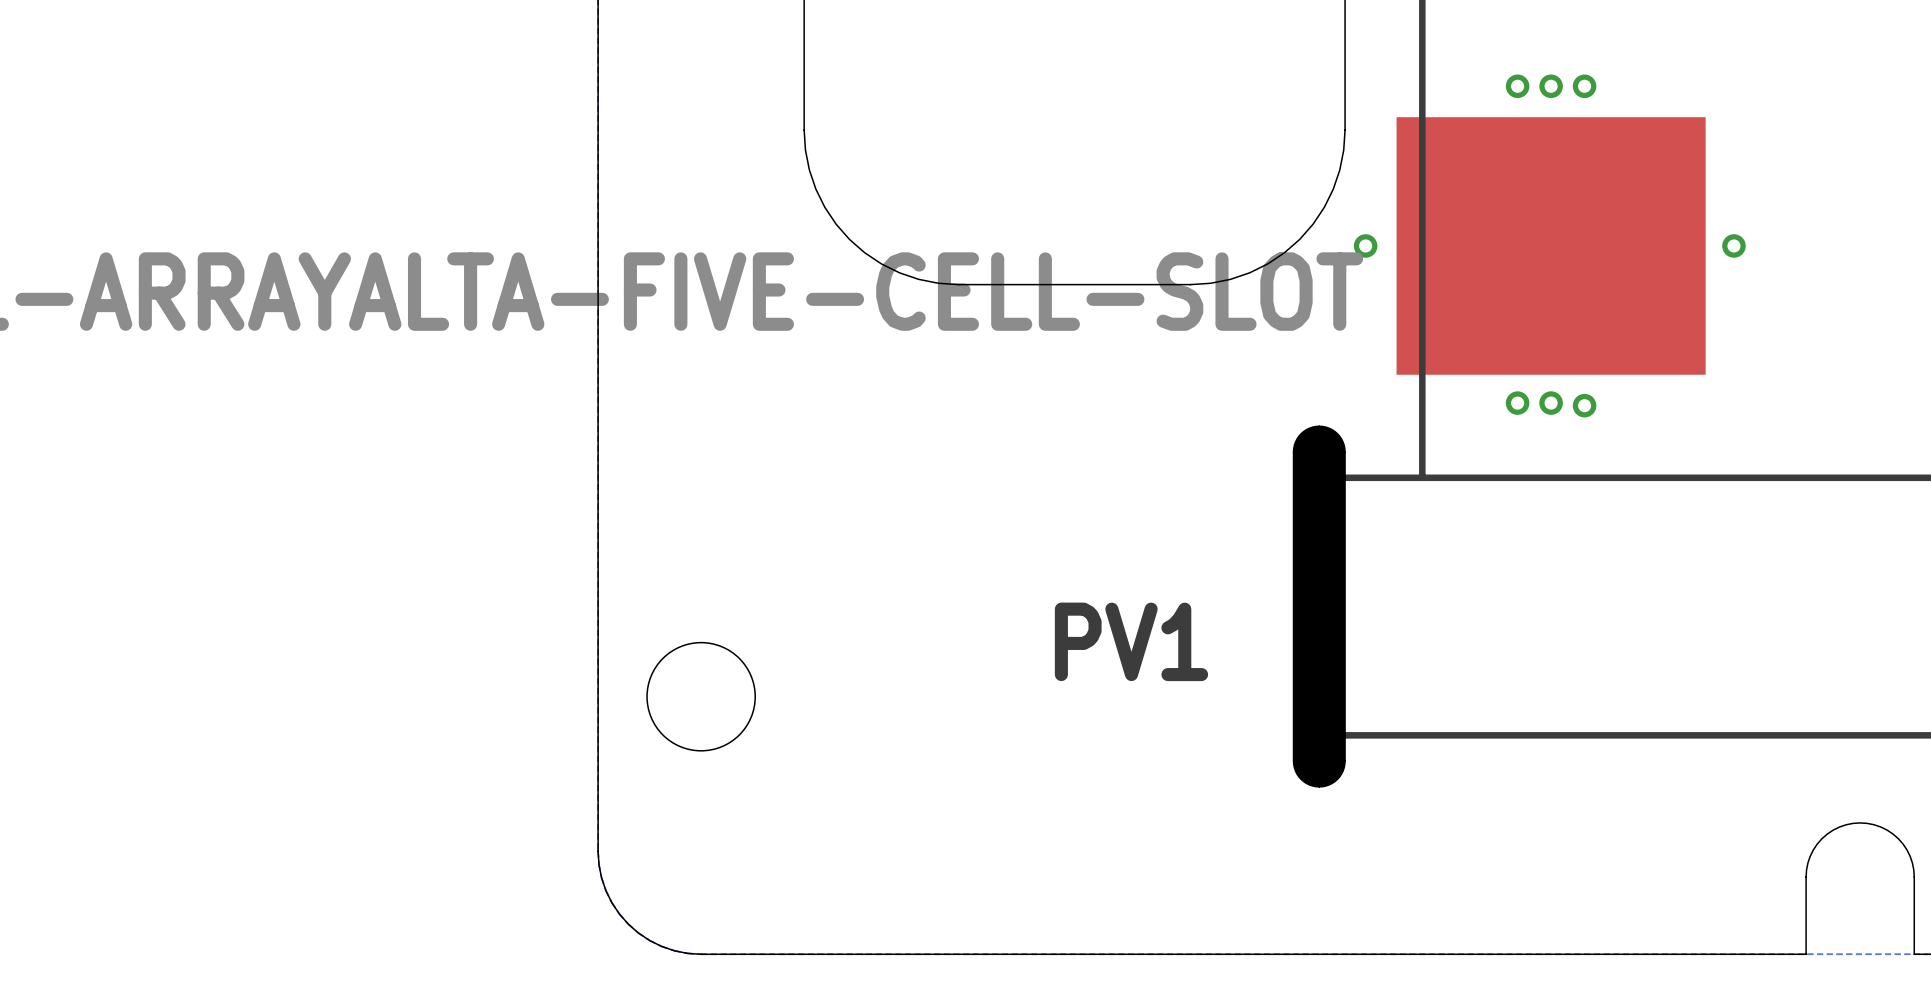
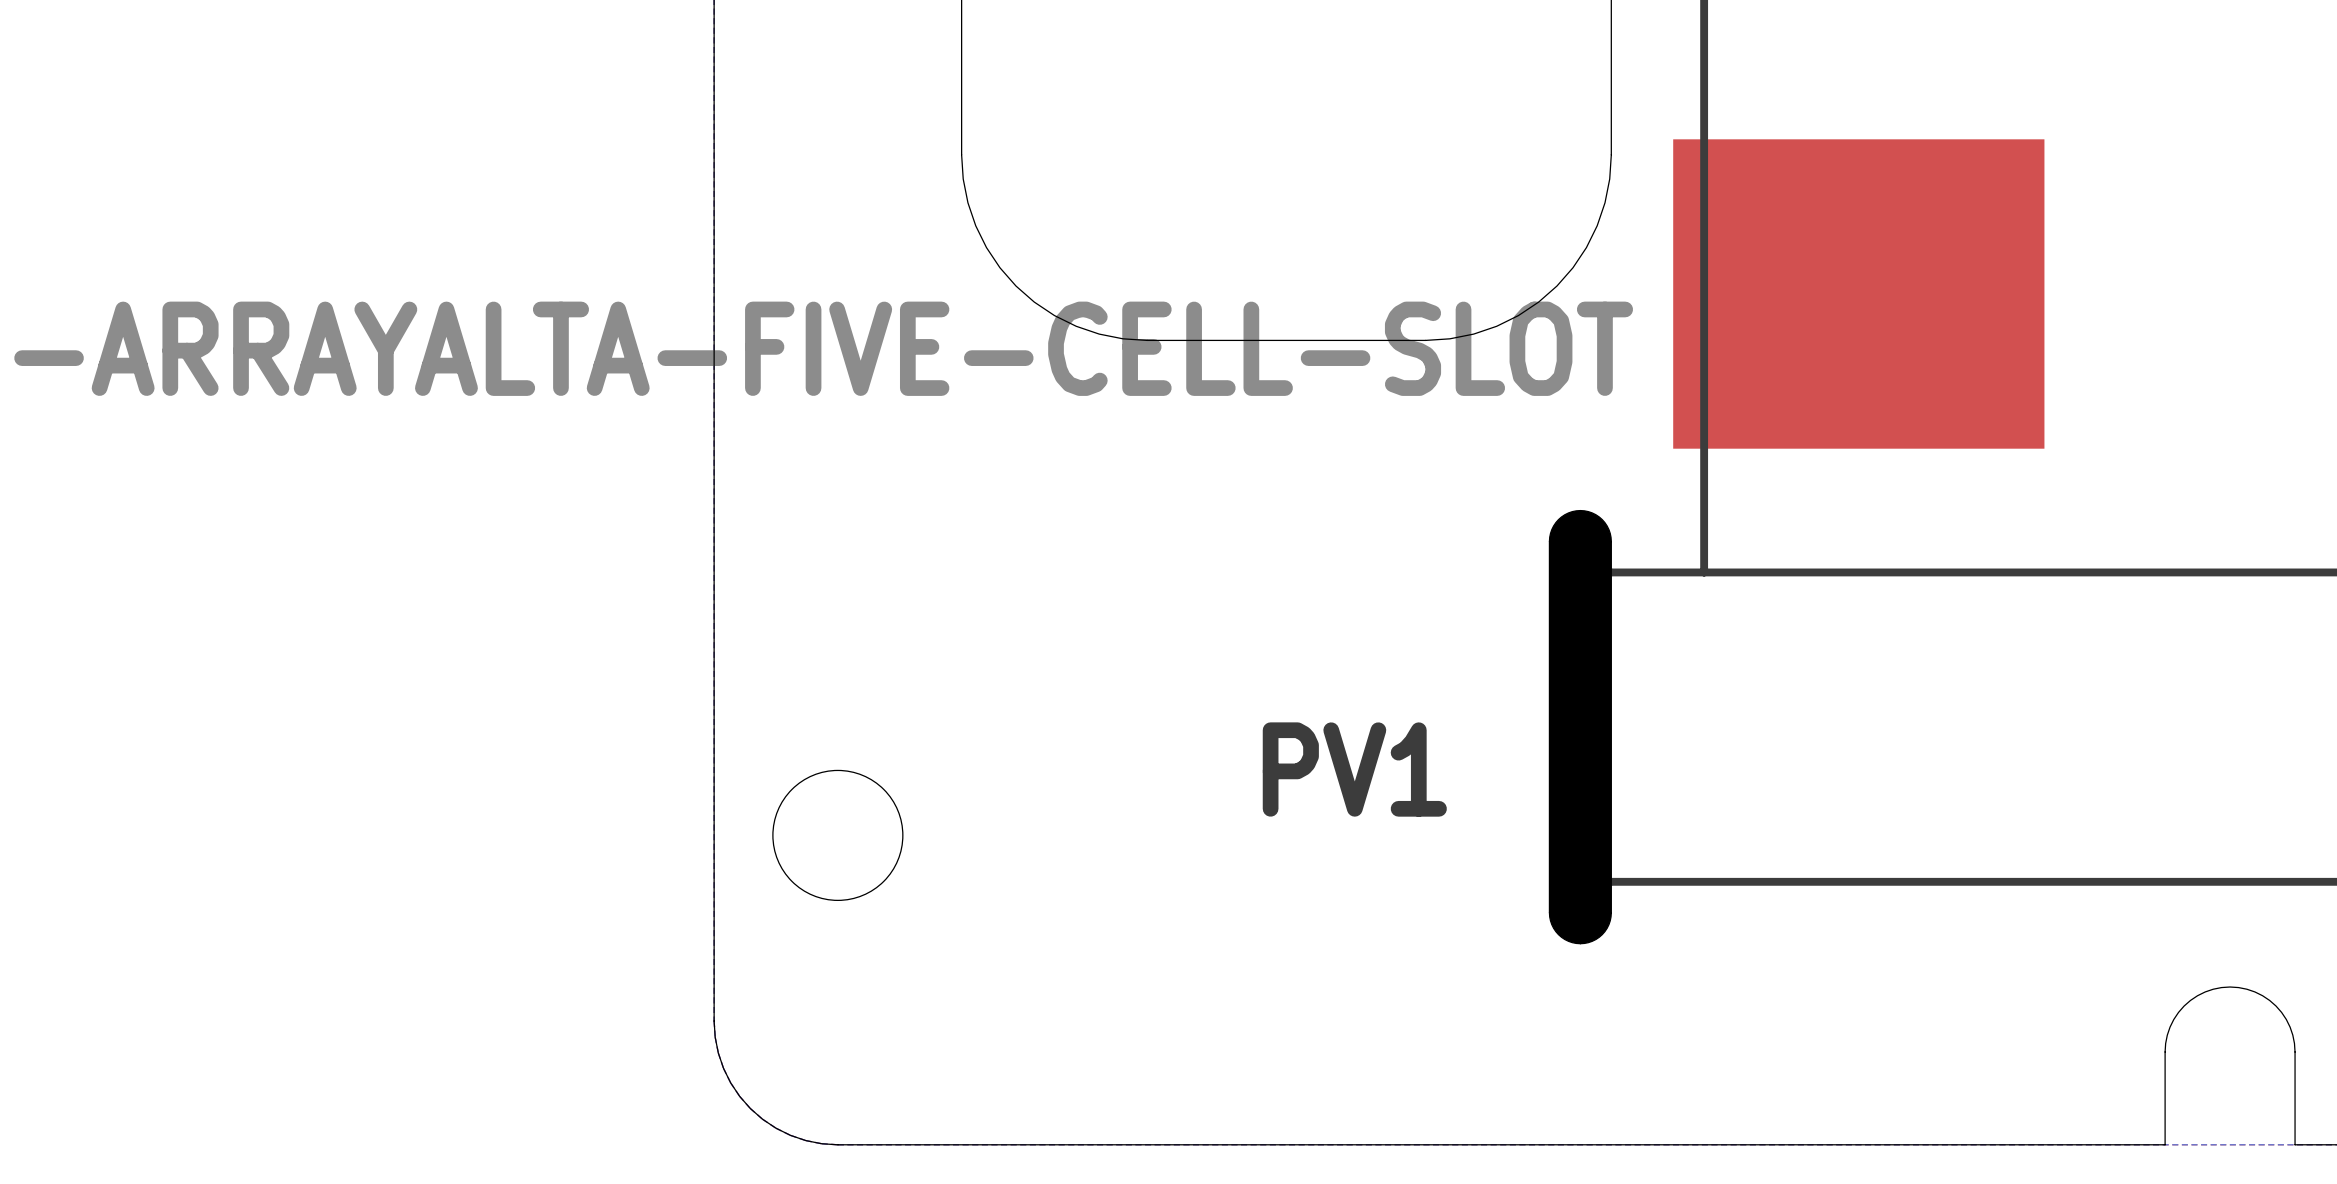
via: (1517, 86) -> none
via: (1551, 86) -> none
via: (1584, 86) -> none
via: (1365, 245) -> none
via: (1733, 245) -> none
via: (1517, 403) -> none
via: (1551, 403) -> none
via: (1584, 405) -> none

